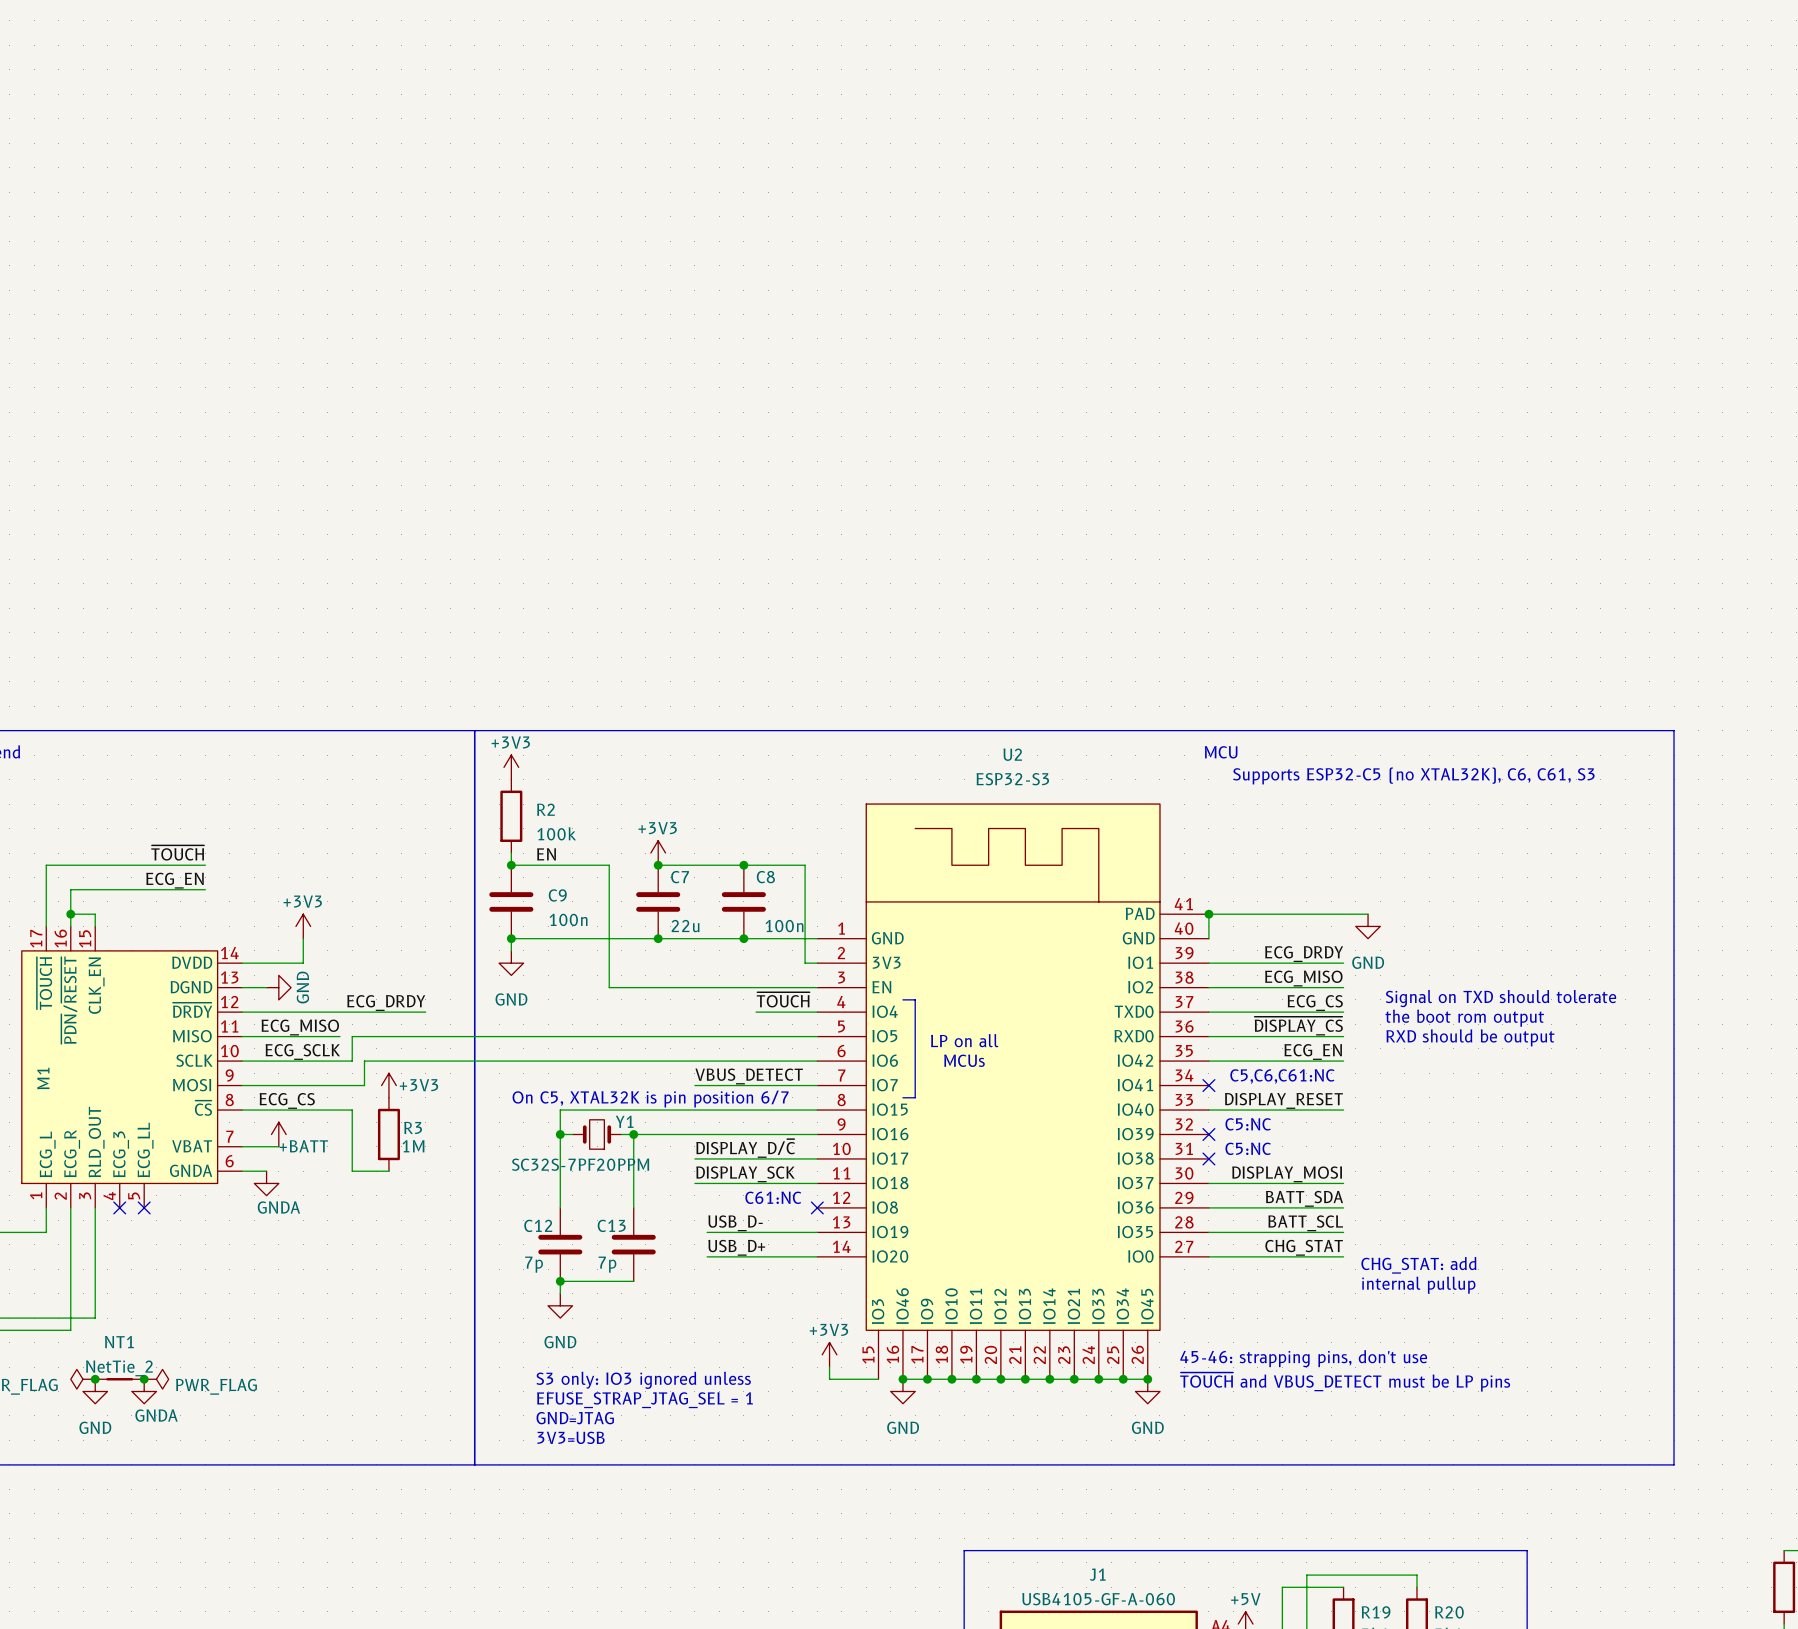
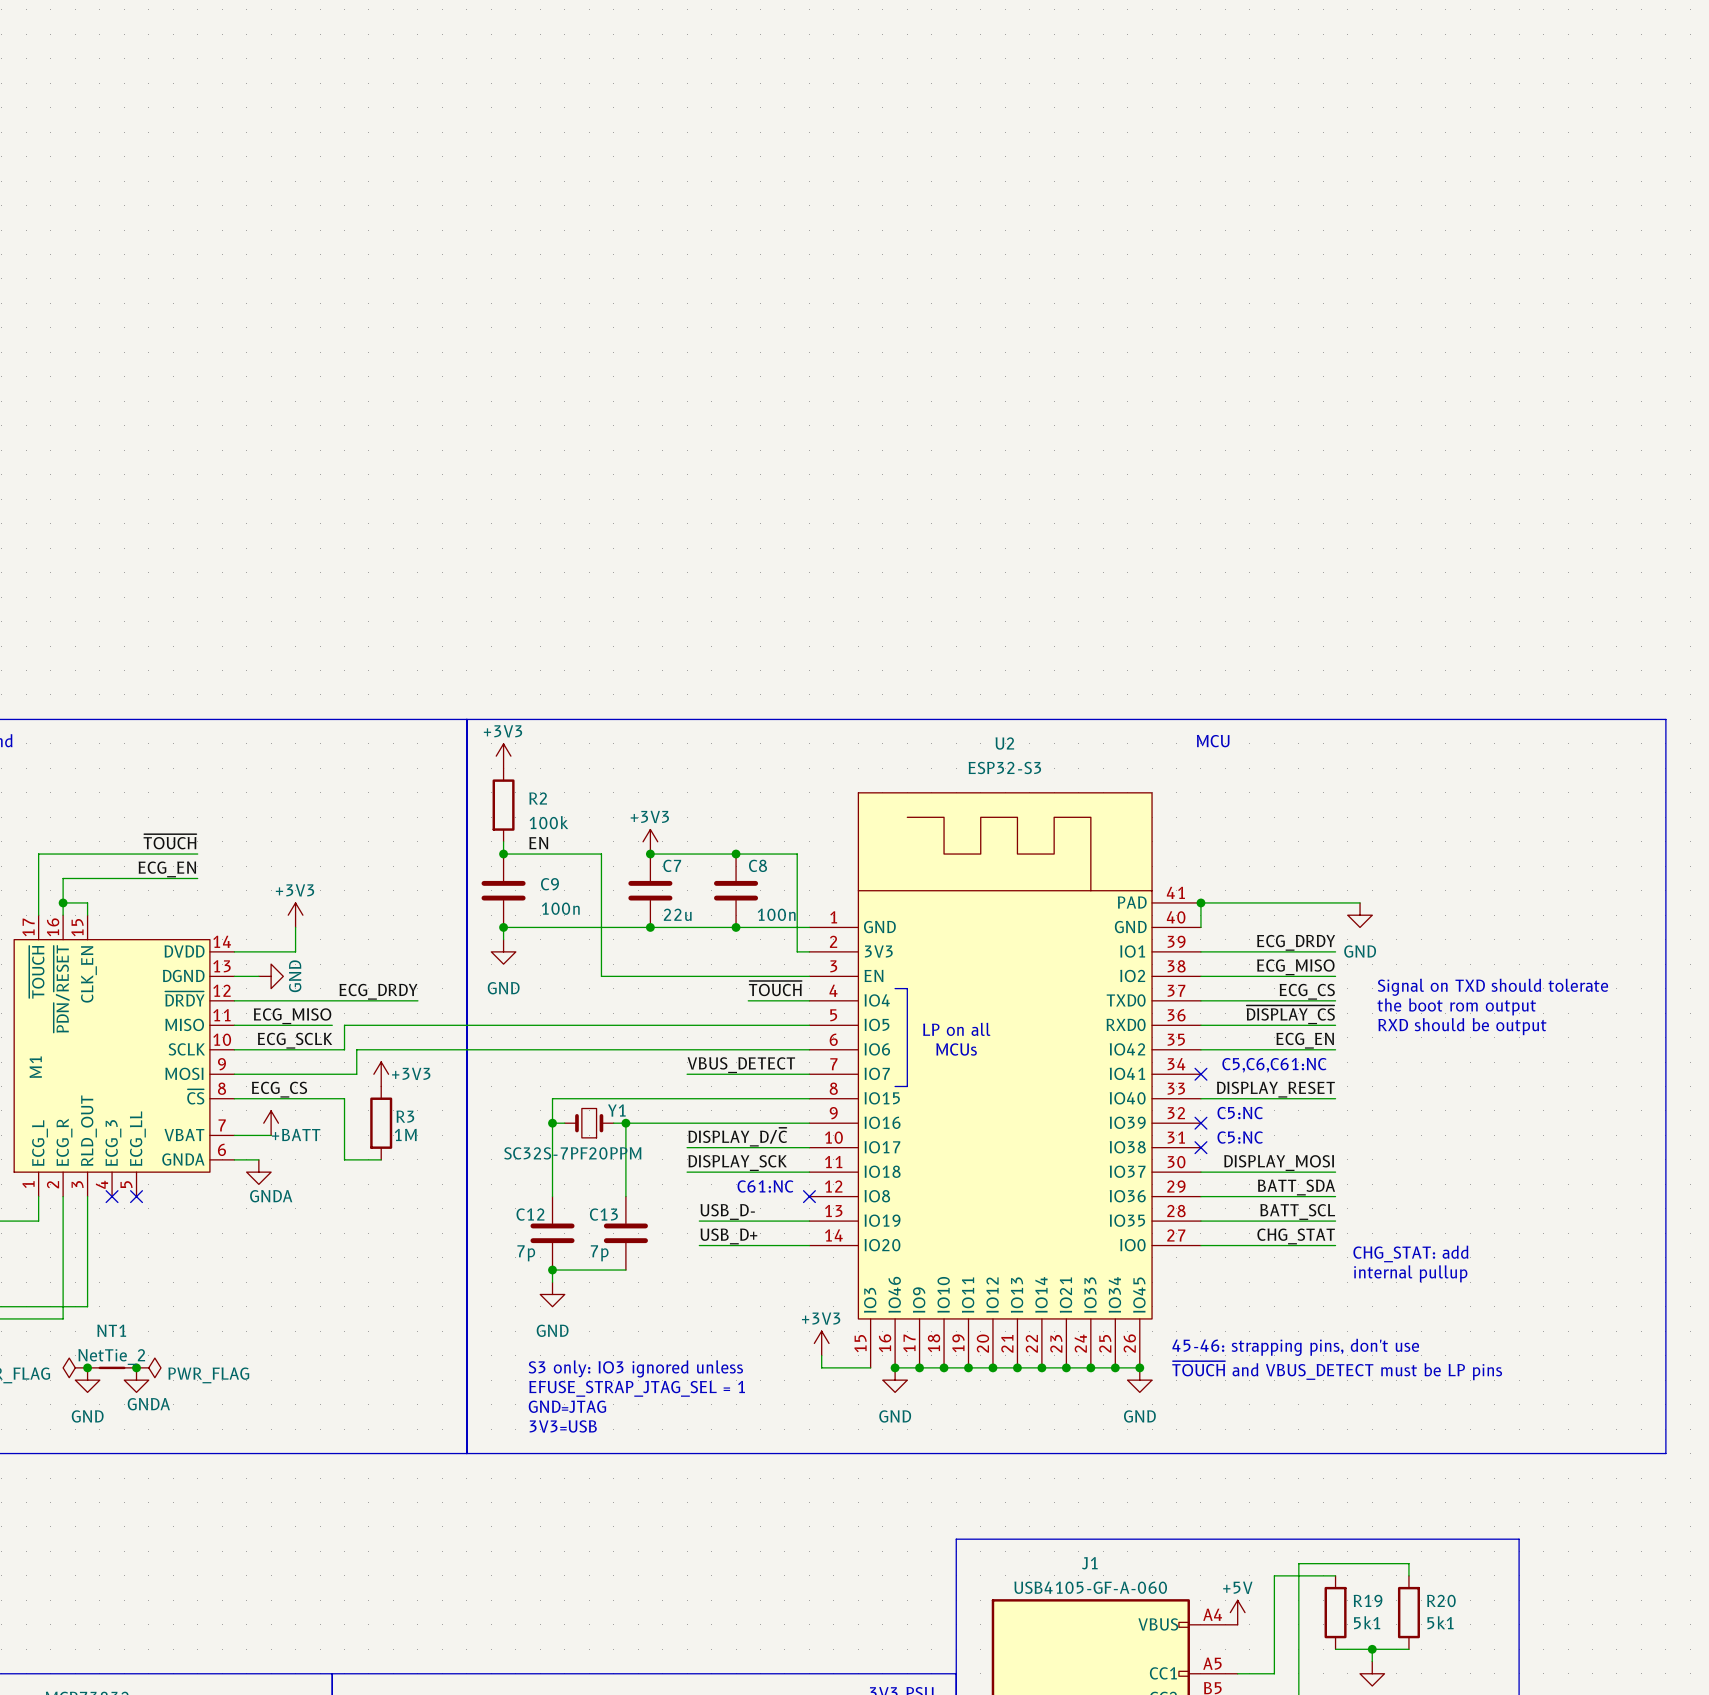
text: Supports ESP32-C5 (no XTAL32K), C6, C61, S3 (1413, 775) -> none
text: On C5, XTAL32K is pin position 6/7 (650, 1099) -> none

